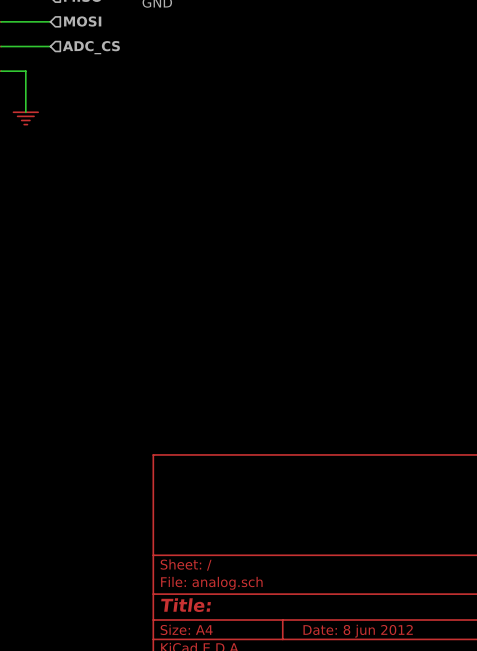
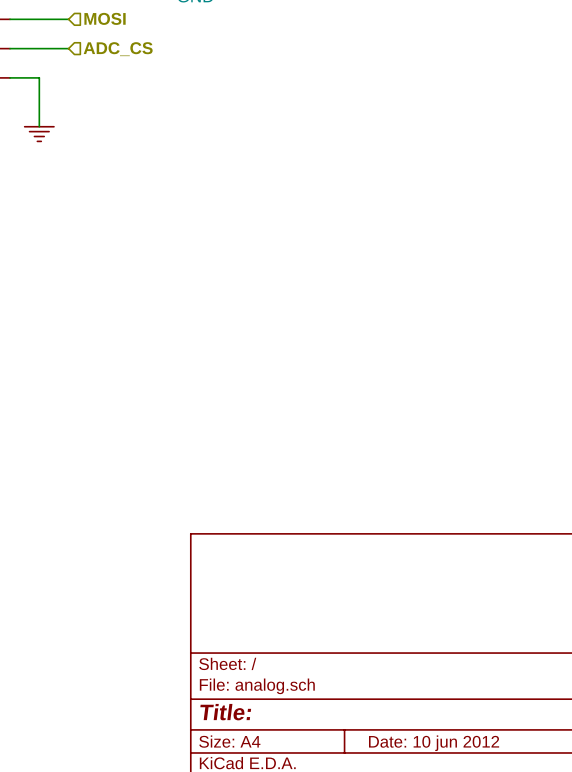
title block: Date: 8 jun 2012 (358, 631) -> Date: 10 jun 2012 (434, 743)

